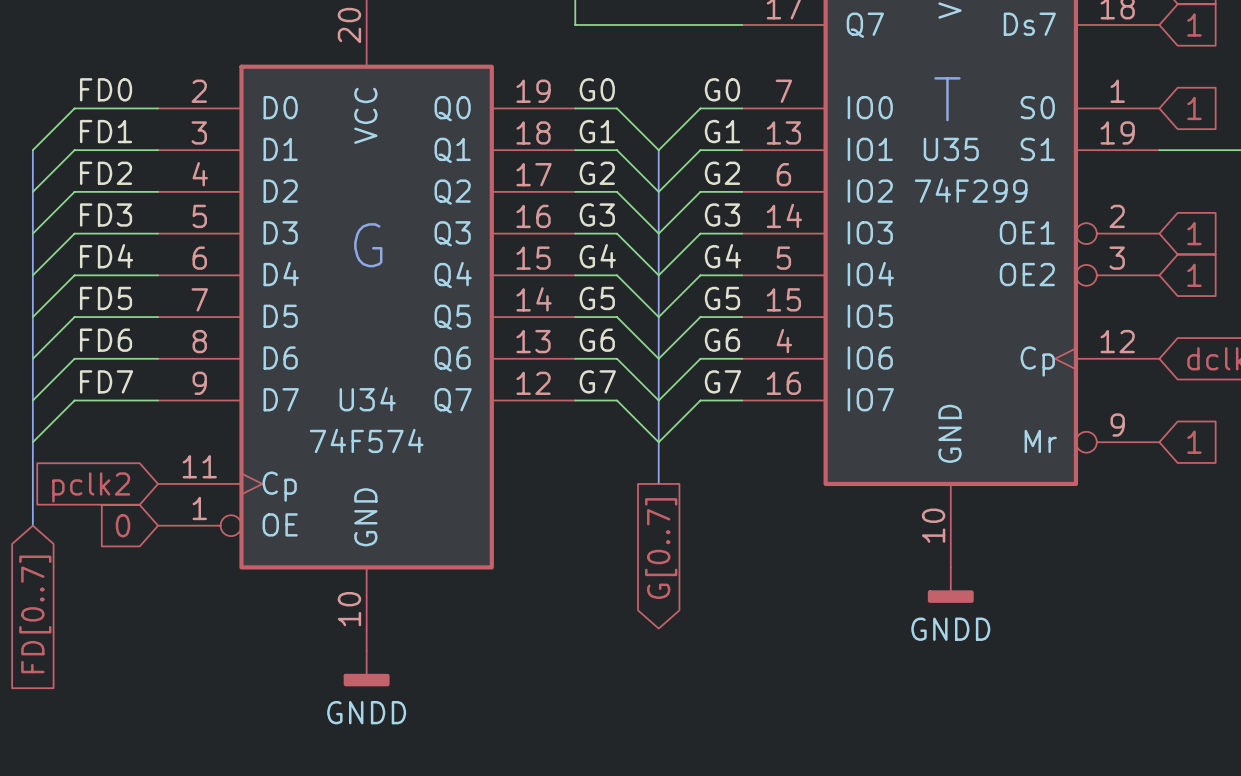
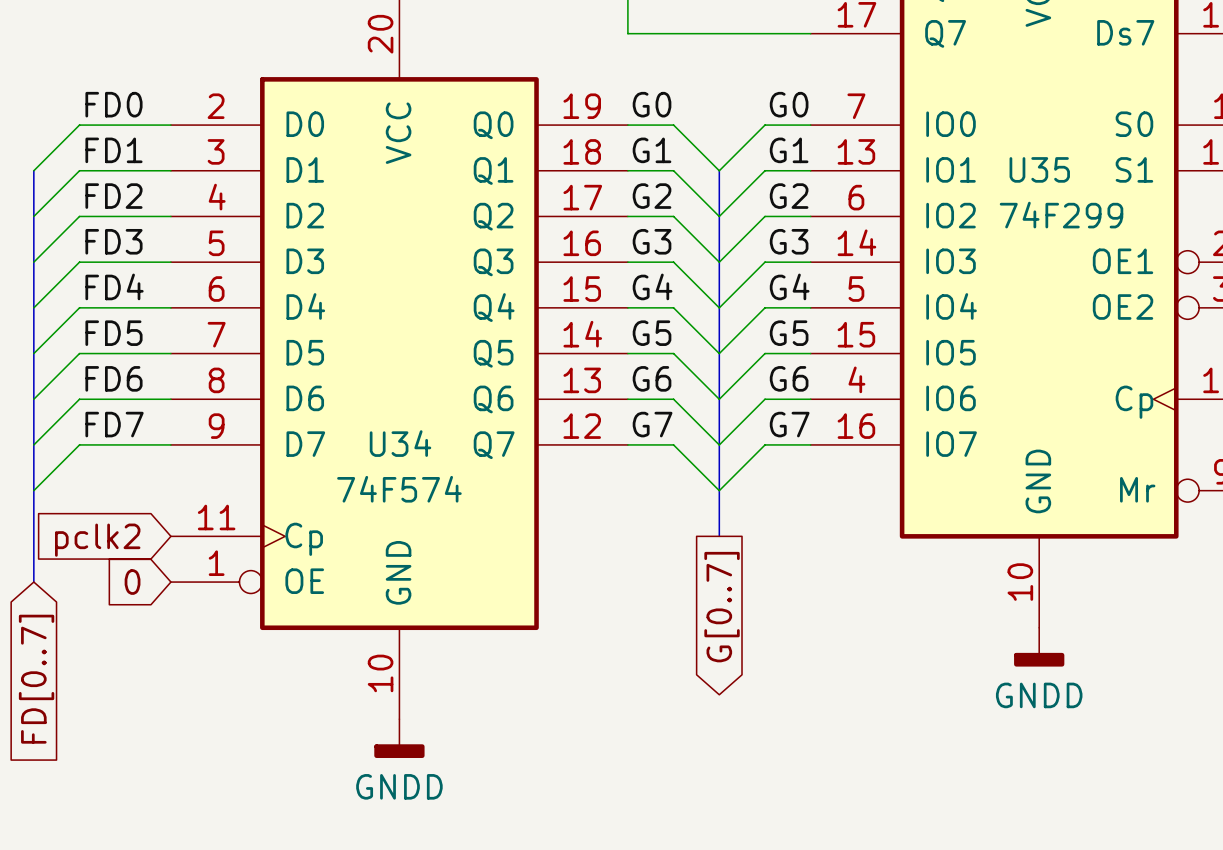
text: T (947, 99) -> none
text: G (368, 245) -> none

